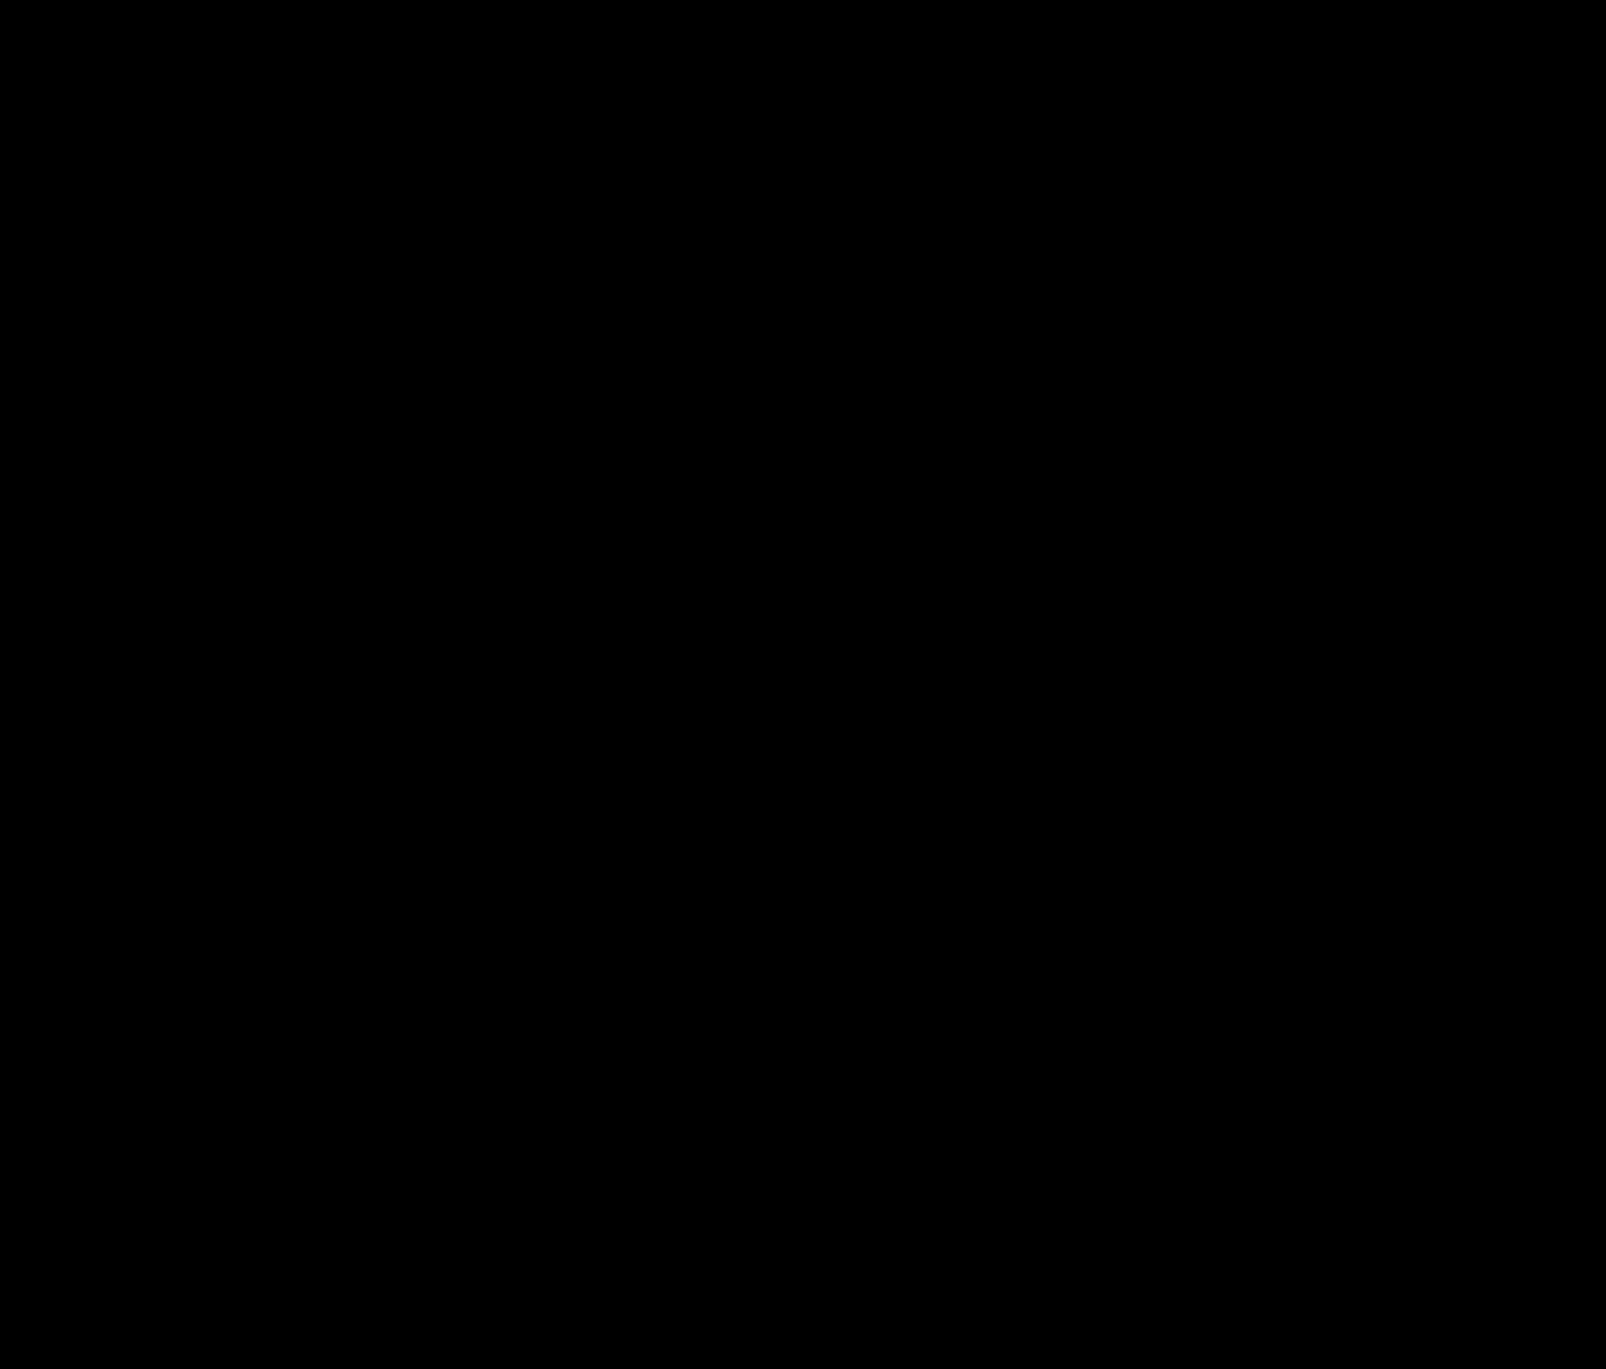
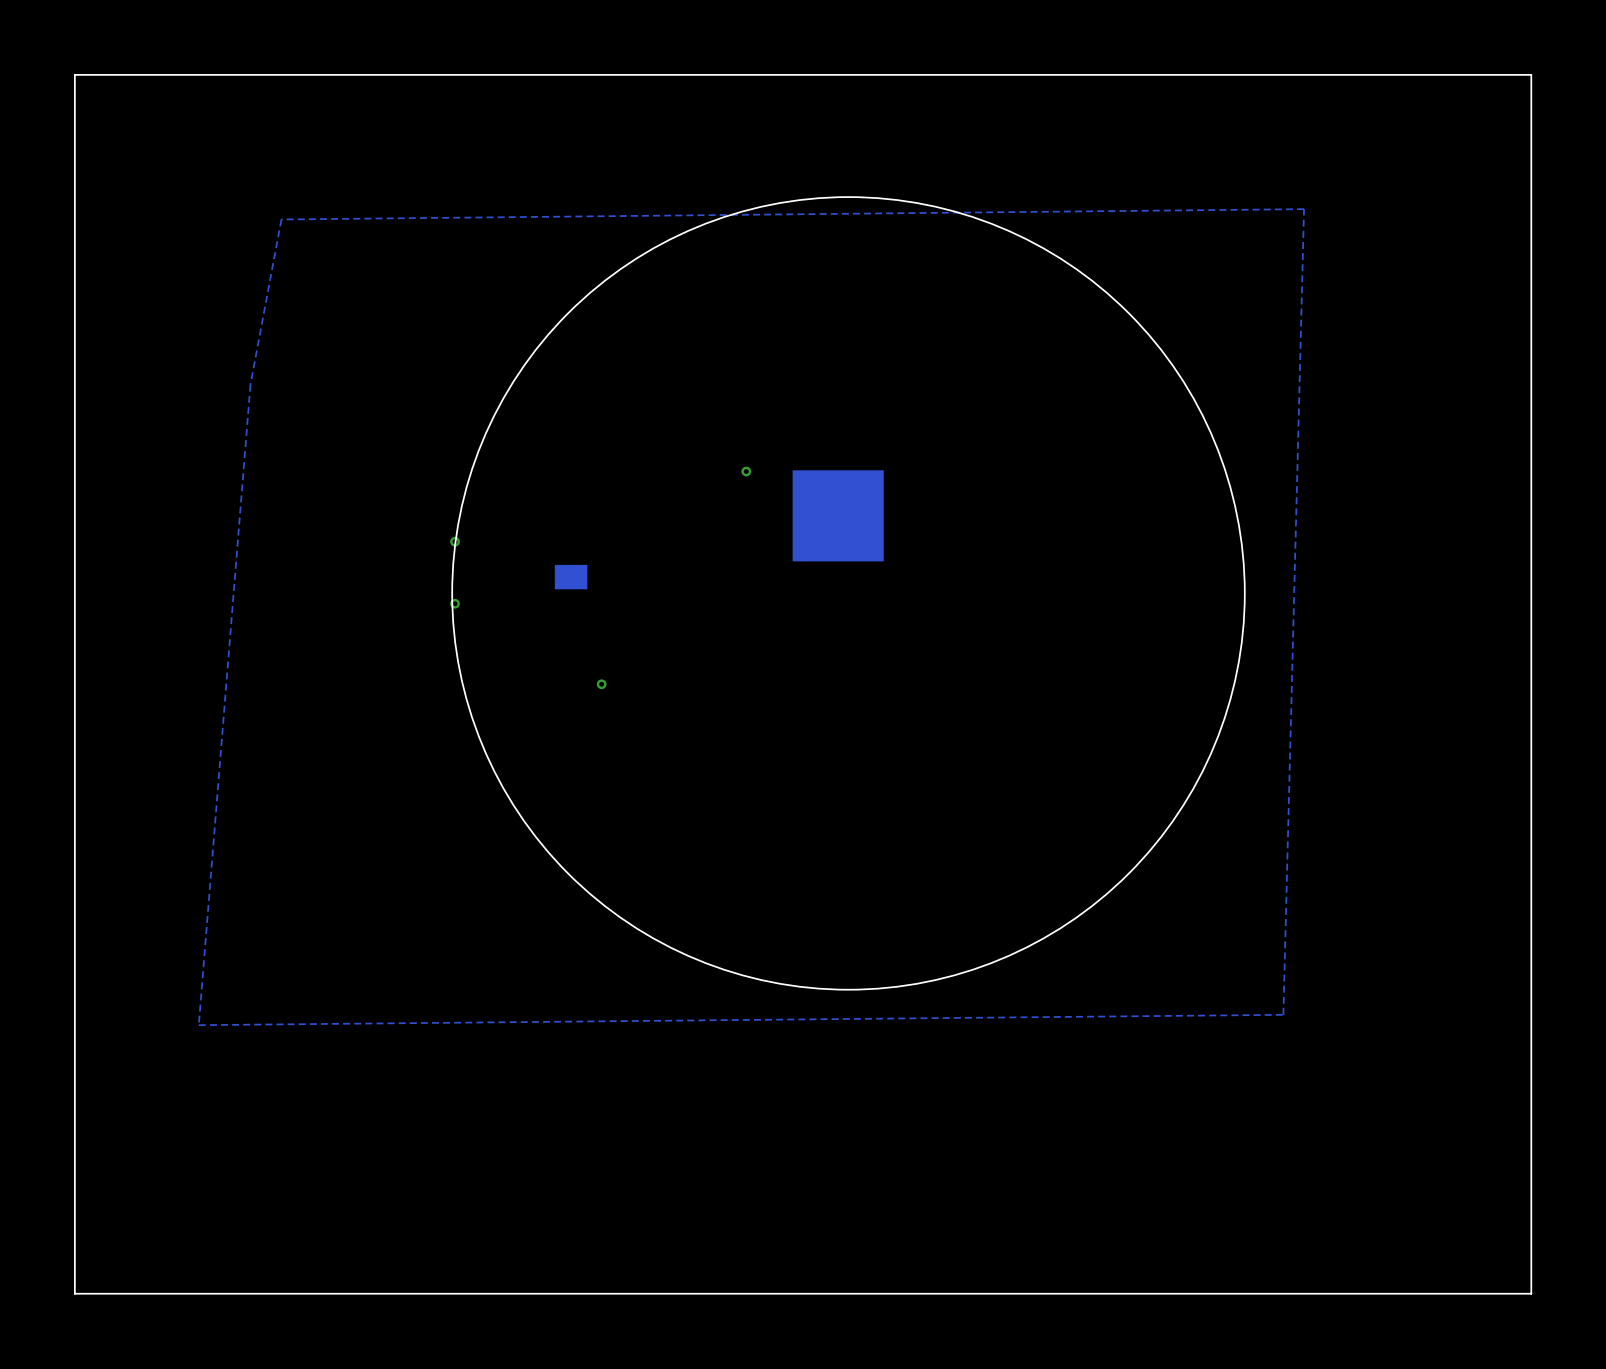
board edge: none -> (1531, 74) (1531, 1293) (74, 1293) (74, 74) (1531, 74)
round board edge: none -> [451, 196, 1246, 991]
zone outline: none -> (1304, 209) (1283, 1014) (198, 1025) (250, 384) (281, 219) (1304, 209)
via: none -> (746, 471)
part: none -> (838, 515)
via: none -> (454, 541)
part: none -> (571, 577)
via: none -> (454, 603)
via: none -> (601, 684)

